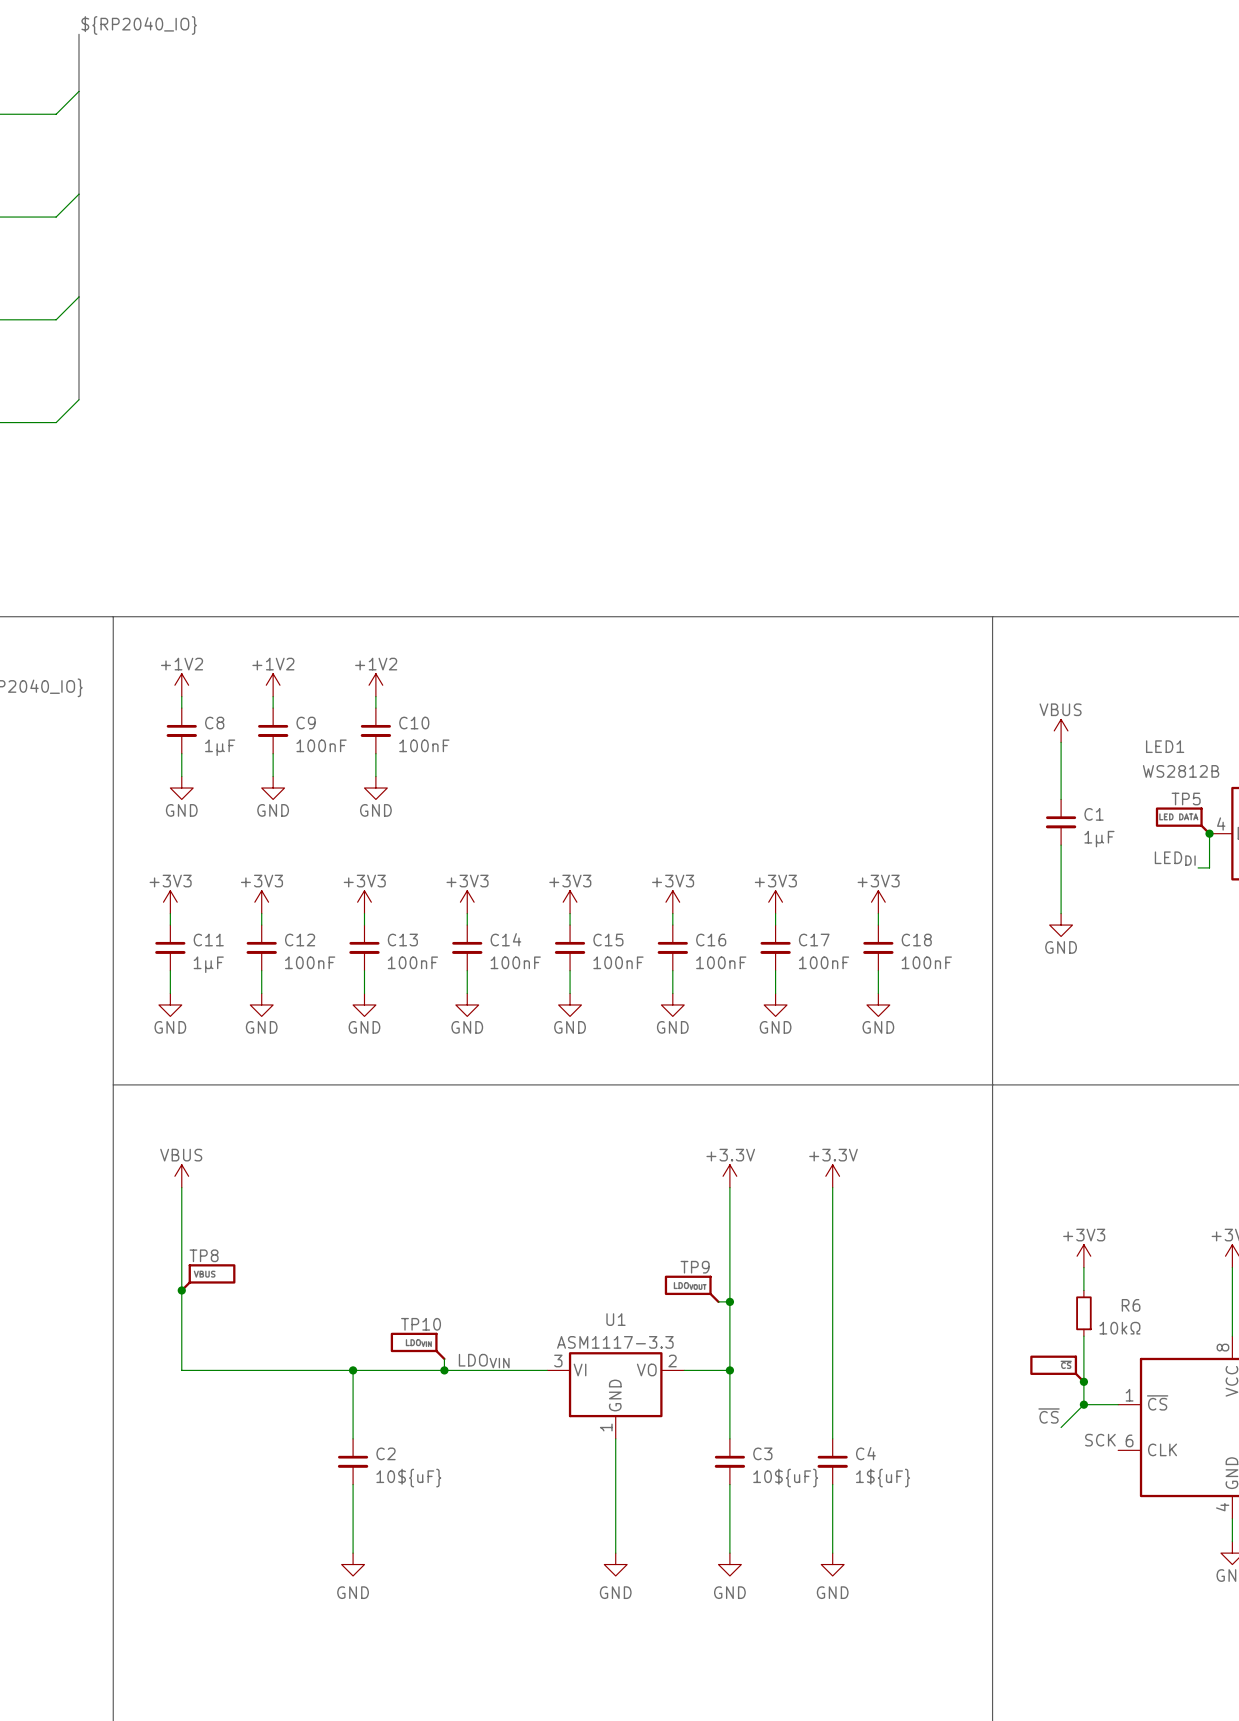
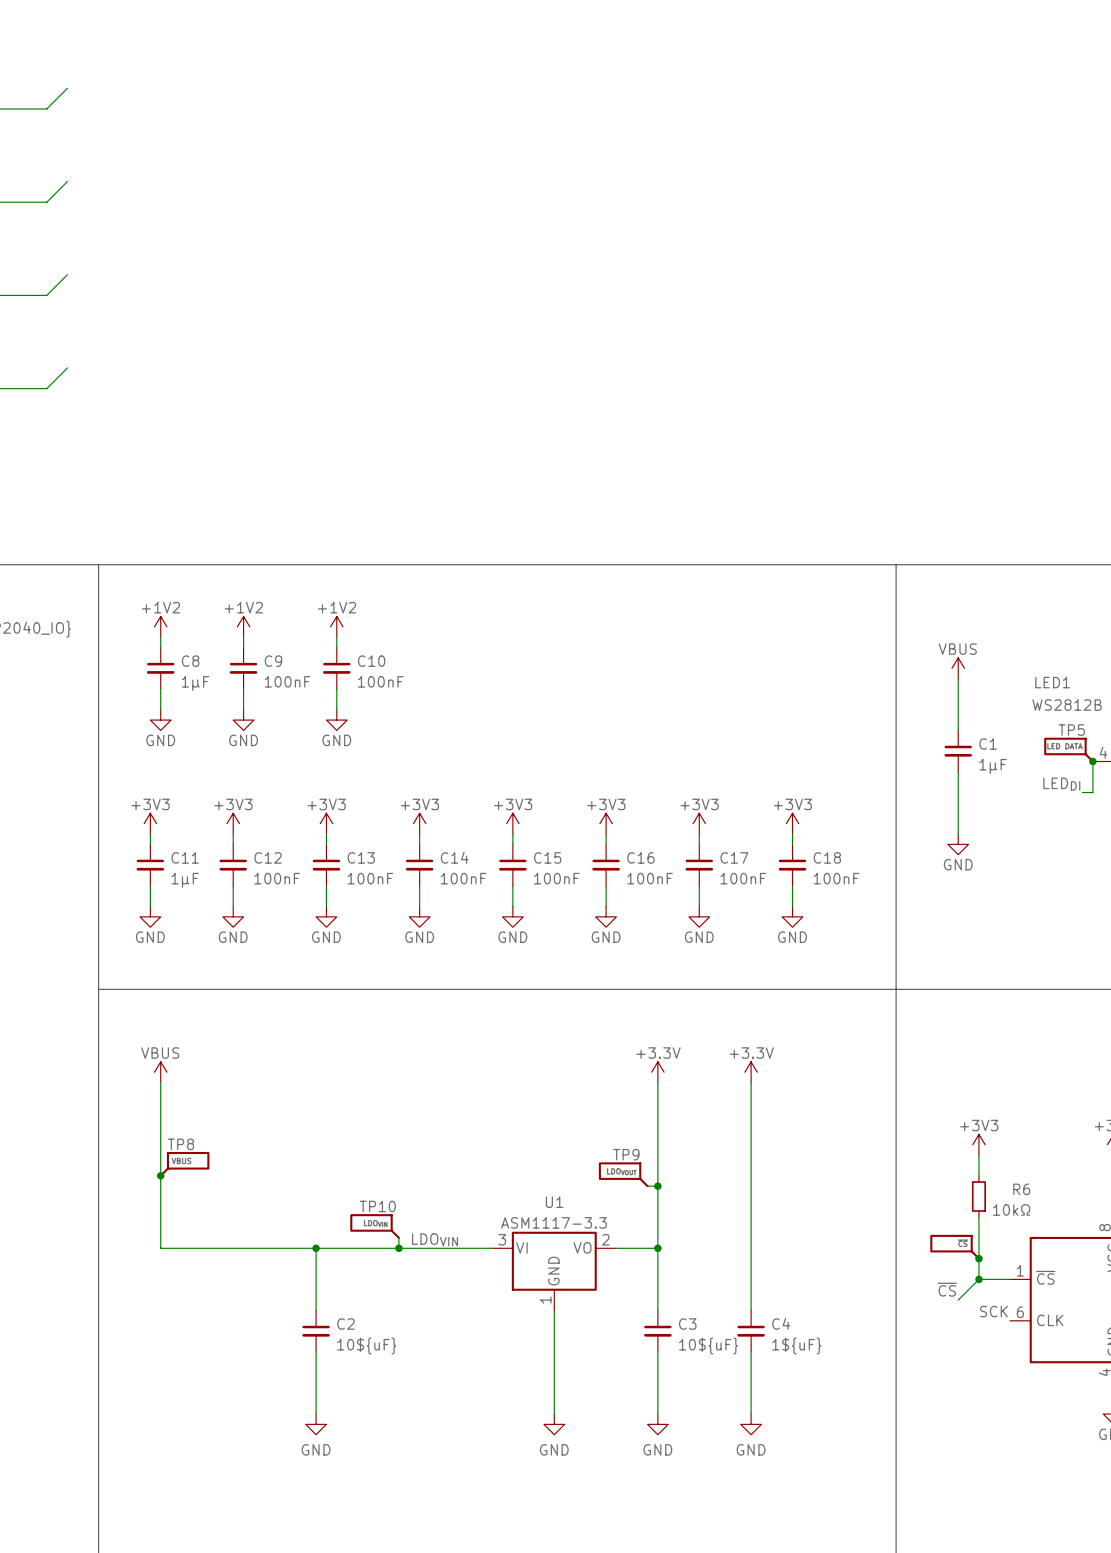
label: ${RP2040_IO} (139, 25) -> none
bus: (78, 34) (78, 399) -> none

